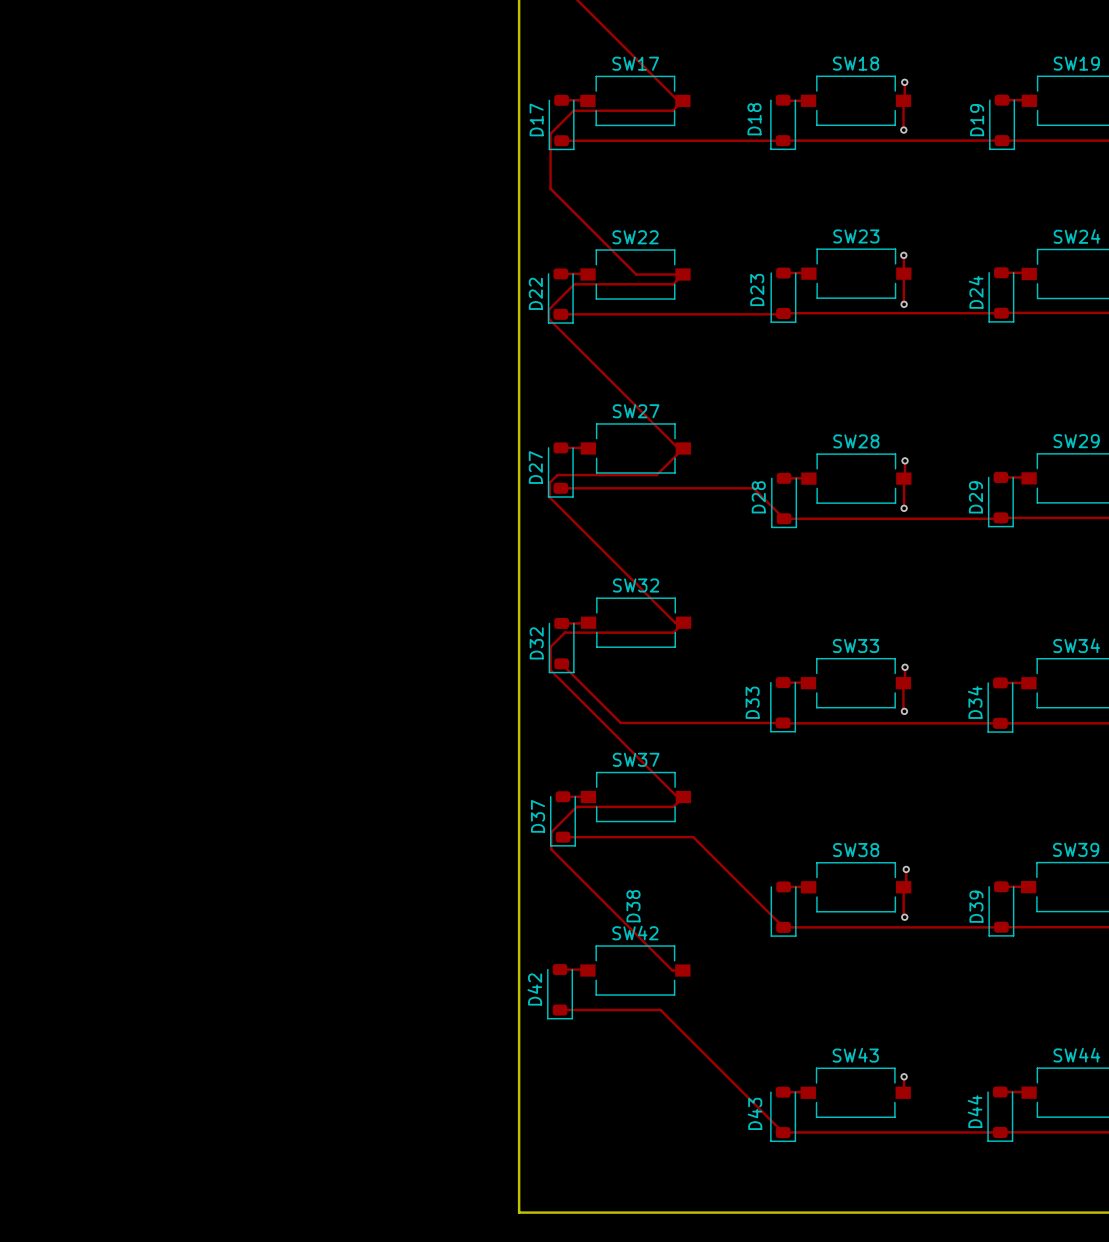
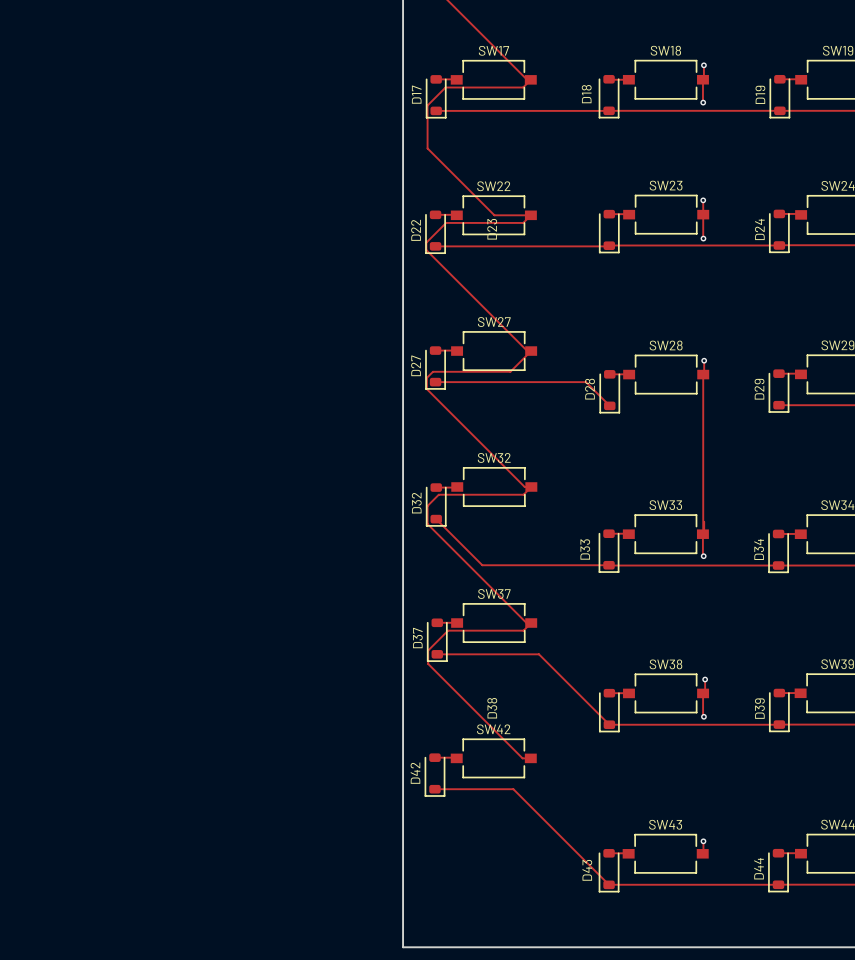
D23 name position: D23 (757, 289) -> D23 (492, 229)
track: (903, 479) (904, 508) -> (703, 375) (703, 533)
via: (904, 508) -> none
track: (1000, 517) (784, 518) -> none
via: (905, 667) -> none

